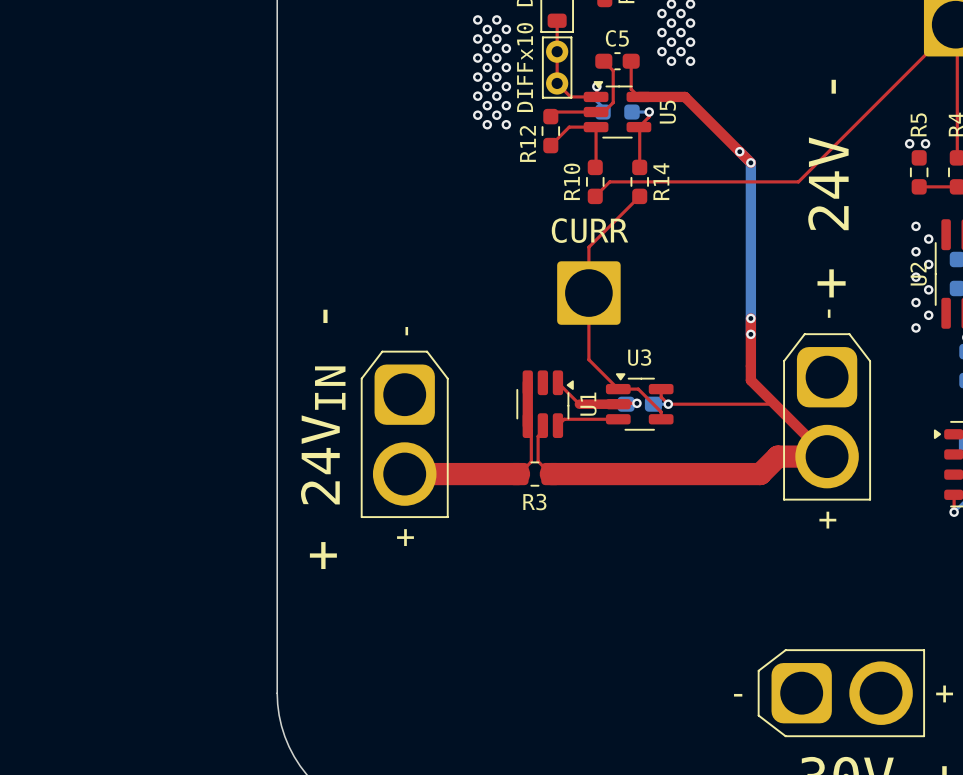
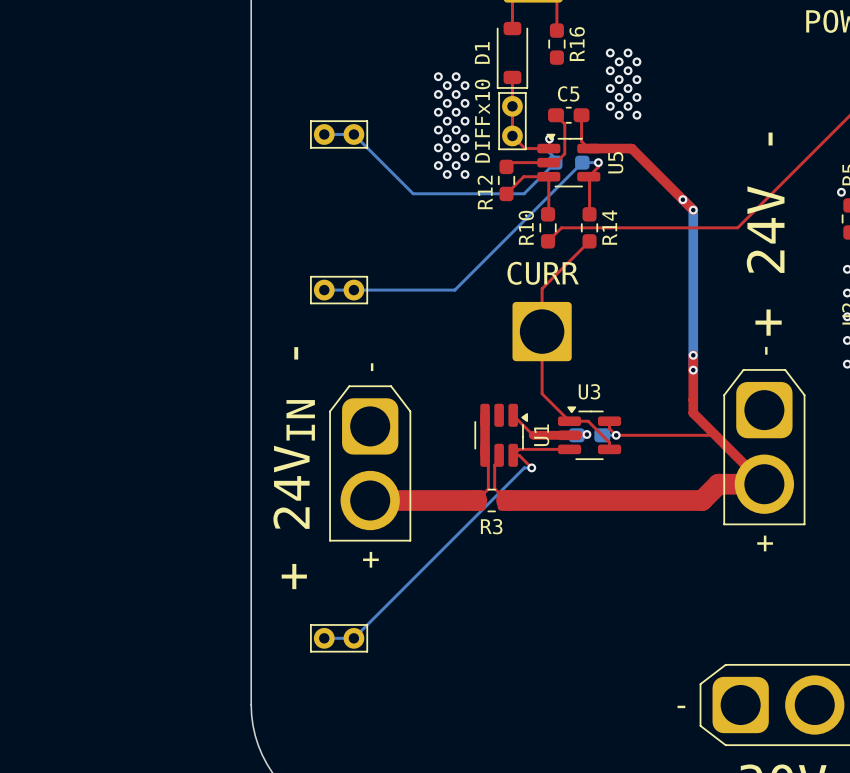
bottom track: none -> (324, 134) (353, 134) (413, 193) (524, 193) (555, 162)
part: none -> (339, 134)
bottom track: none -> (582, 162) (454, 290) (324, 290)
part: none -> (339, 290)
top track: none -> (513, 455) (519, 455) (531, 467)
bottom track: none -> (531, 467) (524, 467) (353, 638) (324, 638)
via: none -> (531, 467)
part: none -> (339, 638)

